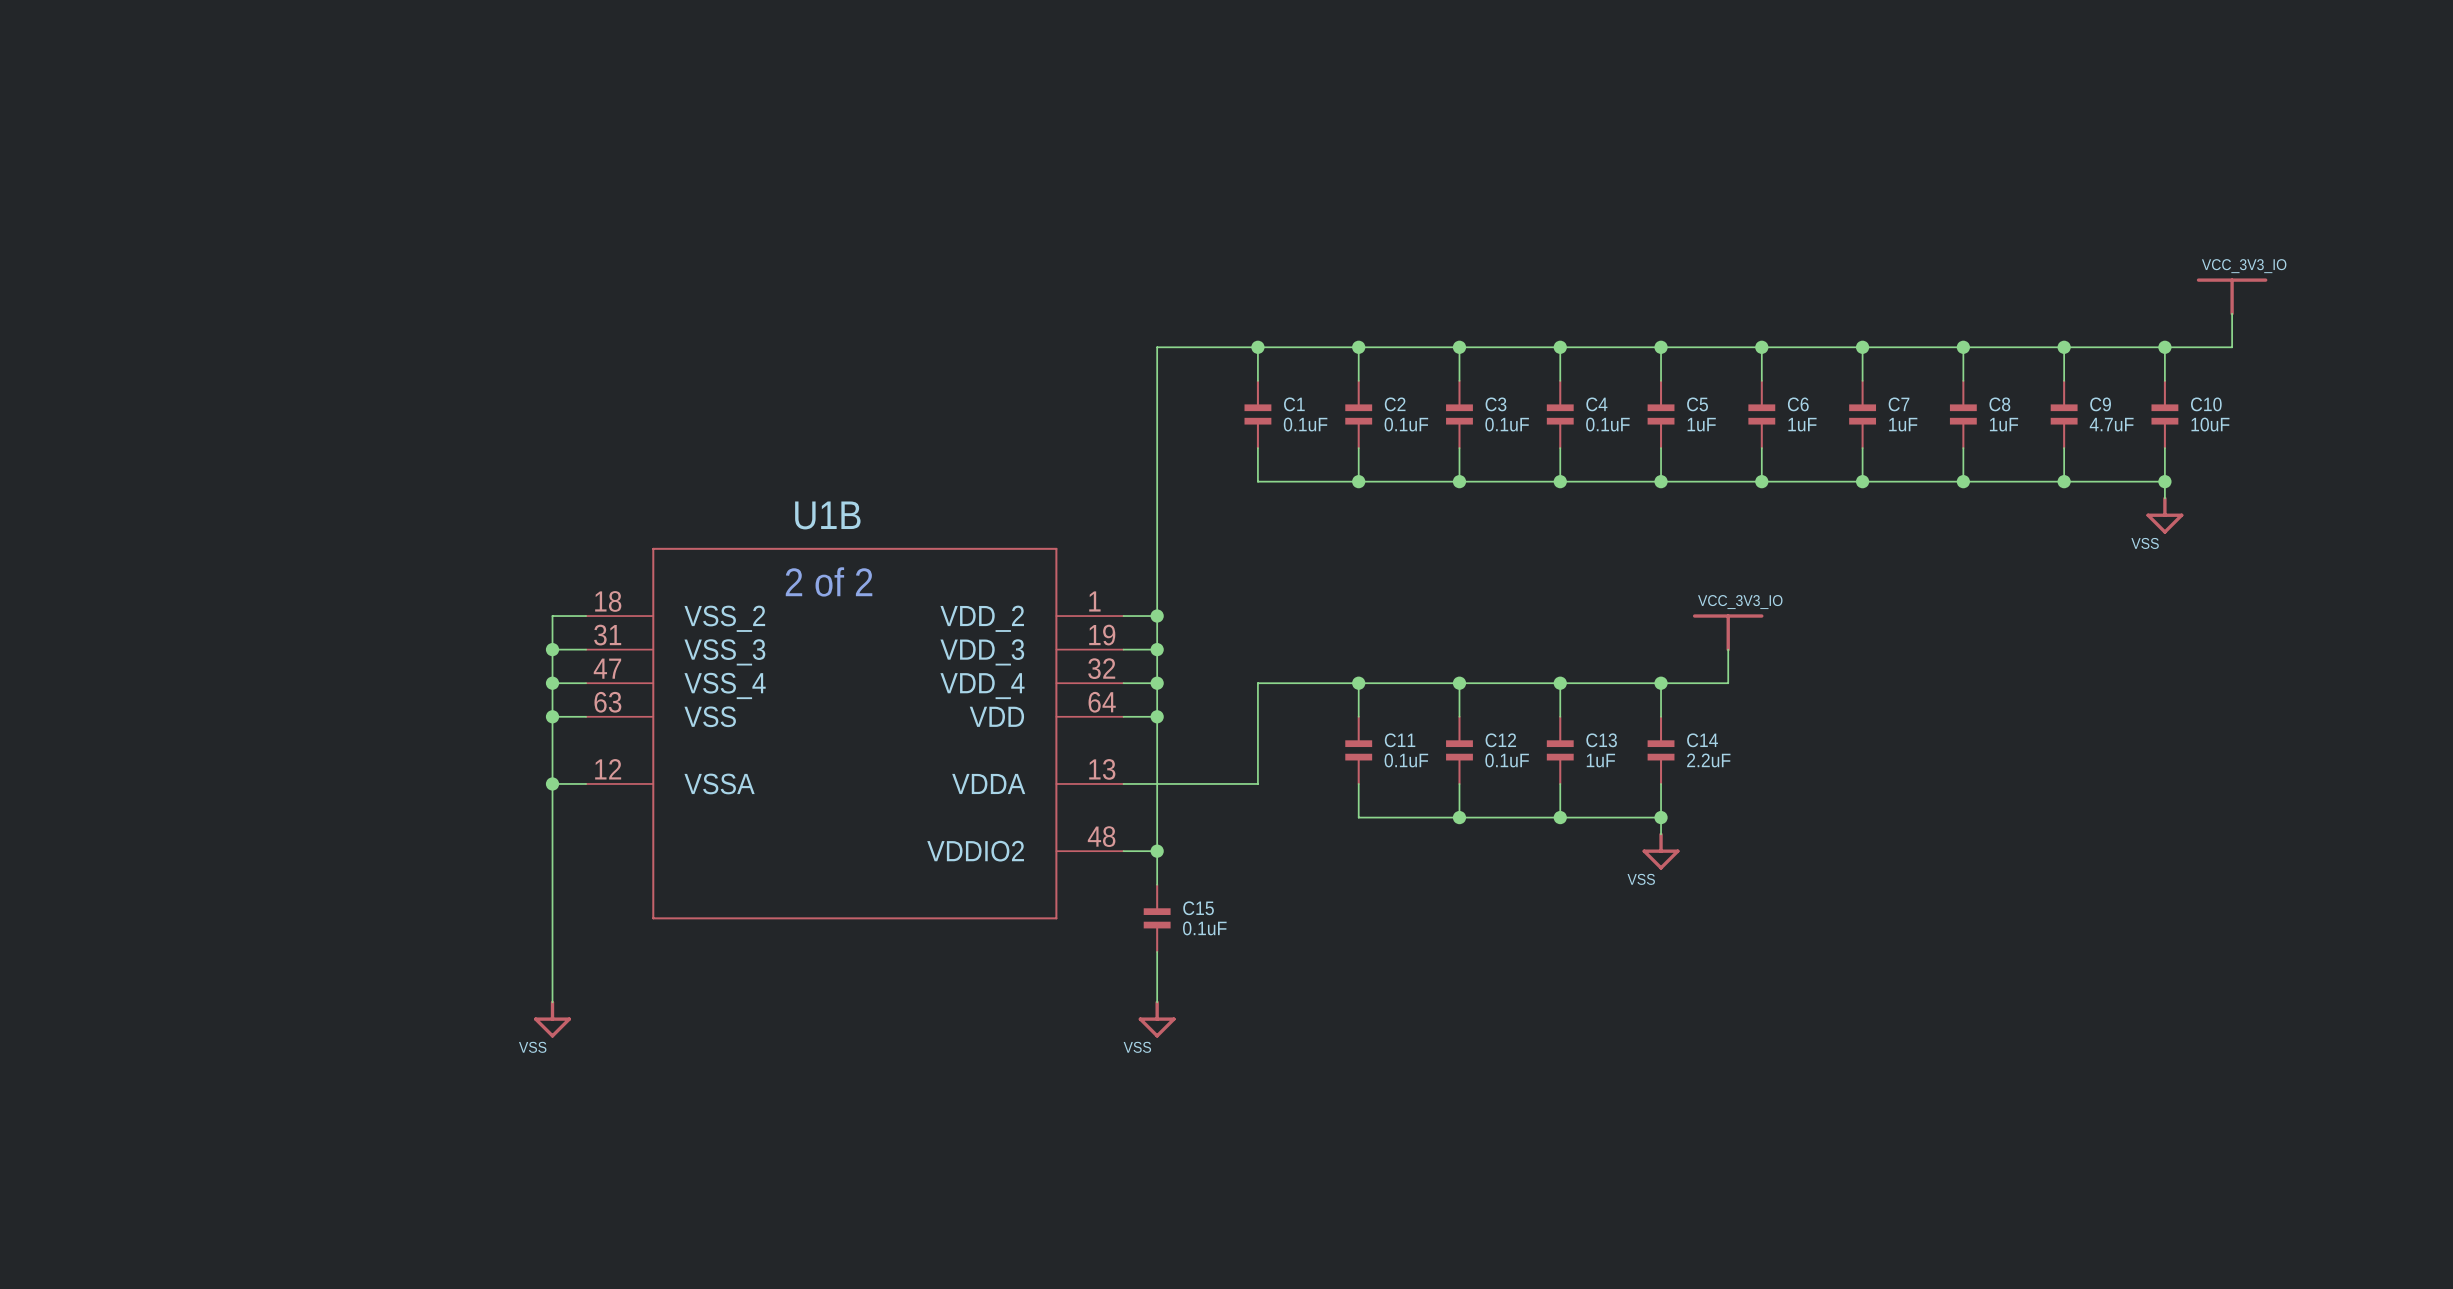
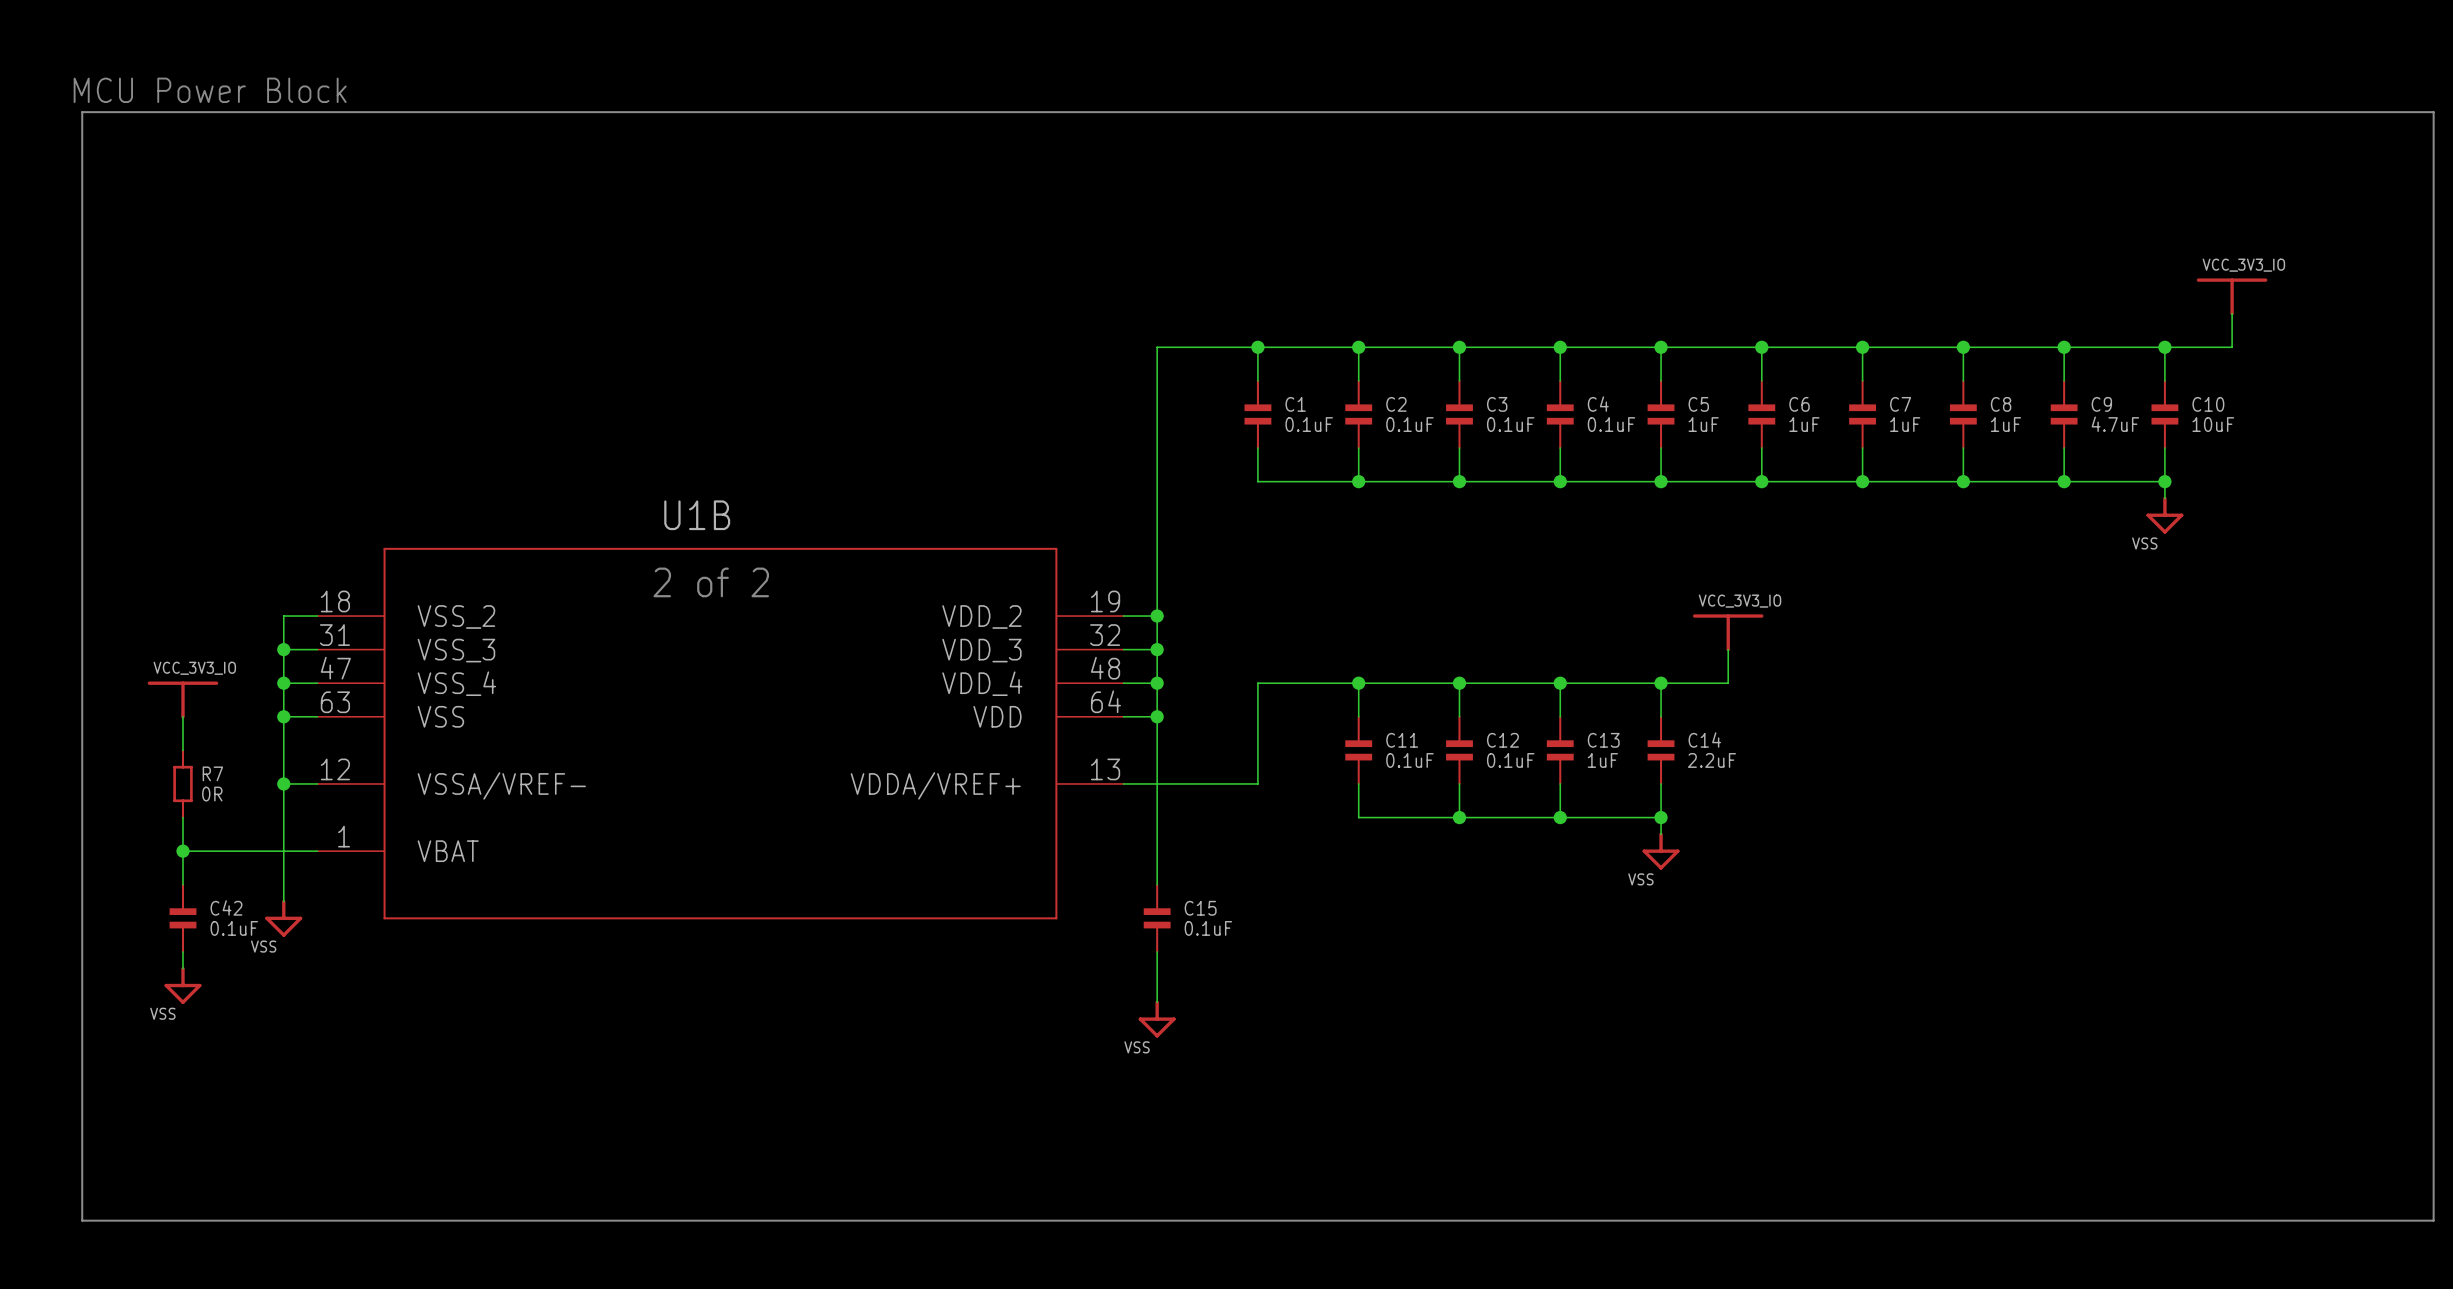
text: none -> MCU Power Block (210, 90)
line: none -> (82, 112) (82, 1220) (2433, 1220) (2433, 112) (82, 112)
U1B symbol: [586, 547, 1124, 920] -> [317, 547, 1124, 920]
wire: none -> (317, 616) (283, 616) (283, 901)
wire: (586, 616) (552, 616) (552, 1002) -> none
junction: none -> (283, 649)
wire: (552, 649) (586, 649) -> (283, 649) (317, 649)
junction: (552, 649) -> none
junction: none -> (283, 683)
wire: (552, 683) (586, 683) -> (283, 683) (317, 683)
junction: (552, 683) -> none
power symbol: none -> VCC_3V3_IO (183, 700)
wire: none -> (183, 716) (183, 750)
junction: none -> (283, 716)
wire: (552, 716) (586, 716) -> (283, 716) (317, 716)
junction: (552, 716) -> none
R7: none -> 0R (183, 783)
junction: none -> (283, 783)
wire: (552, 783) (586, 783) -> (283, 783) (317, 783)
junction: (552, 783) -> none
wire: none -> (183, 817) (183, 884)
wire: none -> (183, 851) (317, 851)
junction: none -> (183, 851)
wire: (1123, 851) (1157, 851) -> none
junction: (1157, 851) -> none
C42: none -> 0.1uF (183, 918)
power symbol: none -> VSS (283, 918)
wire: none -> (183, 951) (183, 968)
power symbol: none -> VSS (183, 985)
power symbol: VSS (552, 1019) -> none

